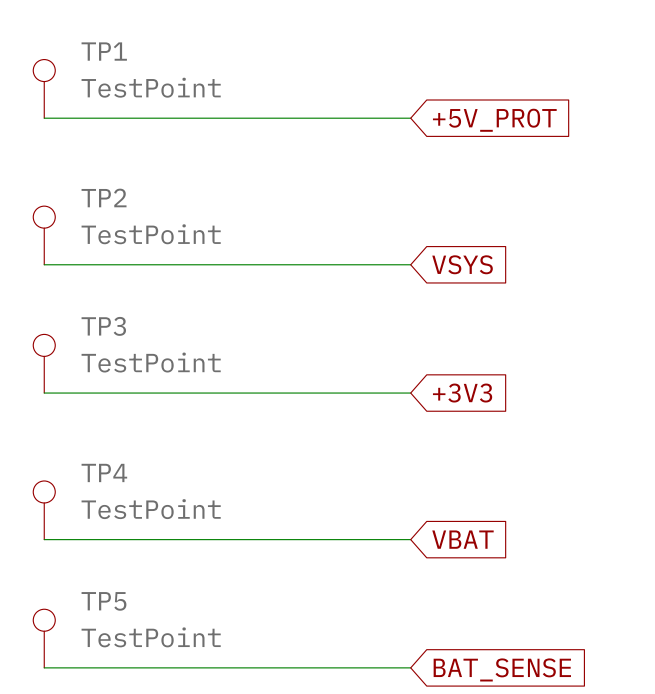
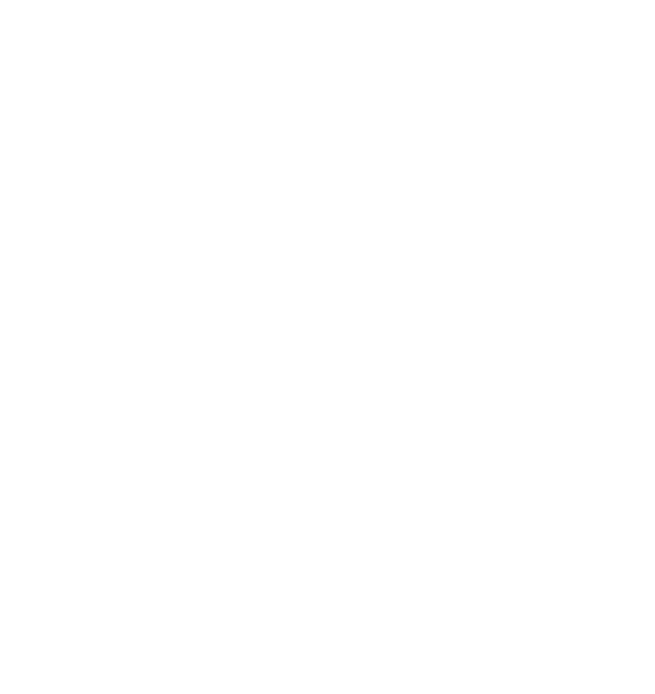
TP1: TestPoint (44, 88) -> none
wire: (44, 118) (410, 118) -> none
global label: +5V_PROT (494, 120) -> none
TP2: TestPoint (44, 235) -> none
wire: (44, 264) (410, 264) -> none
global label: VSYS (462, 264) -> none
TP3: TestPoint (44, 363) -> none
wire: (44, 393) (410, 393) -> none
global label: +3V3 (462, 393) -> none
TP4: TestPoint (44, 510) -> none
wire: (44, 539) (410, 539) -> none
global label: VBAT (462, 539) -> none
TP5: TestPoint (44, 638) -> none
wire: (44, 667) (410, 667) -> none
global label: BAT_SENSE (502, 669) -> none

